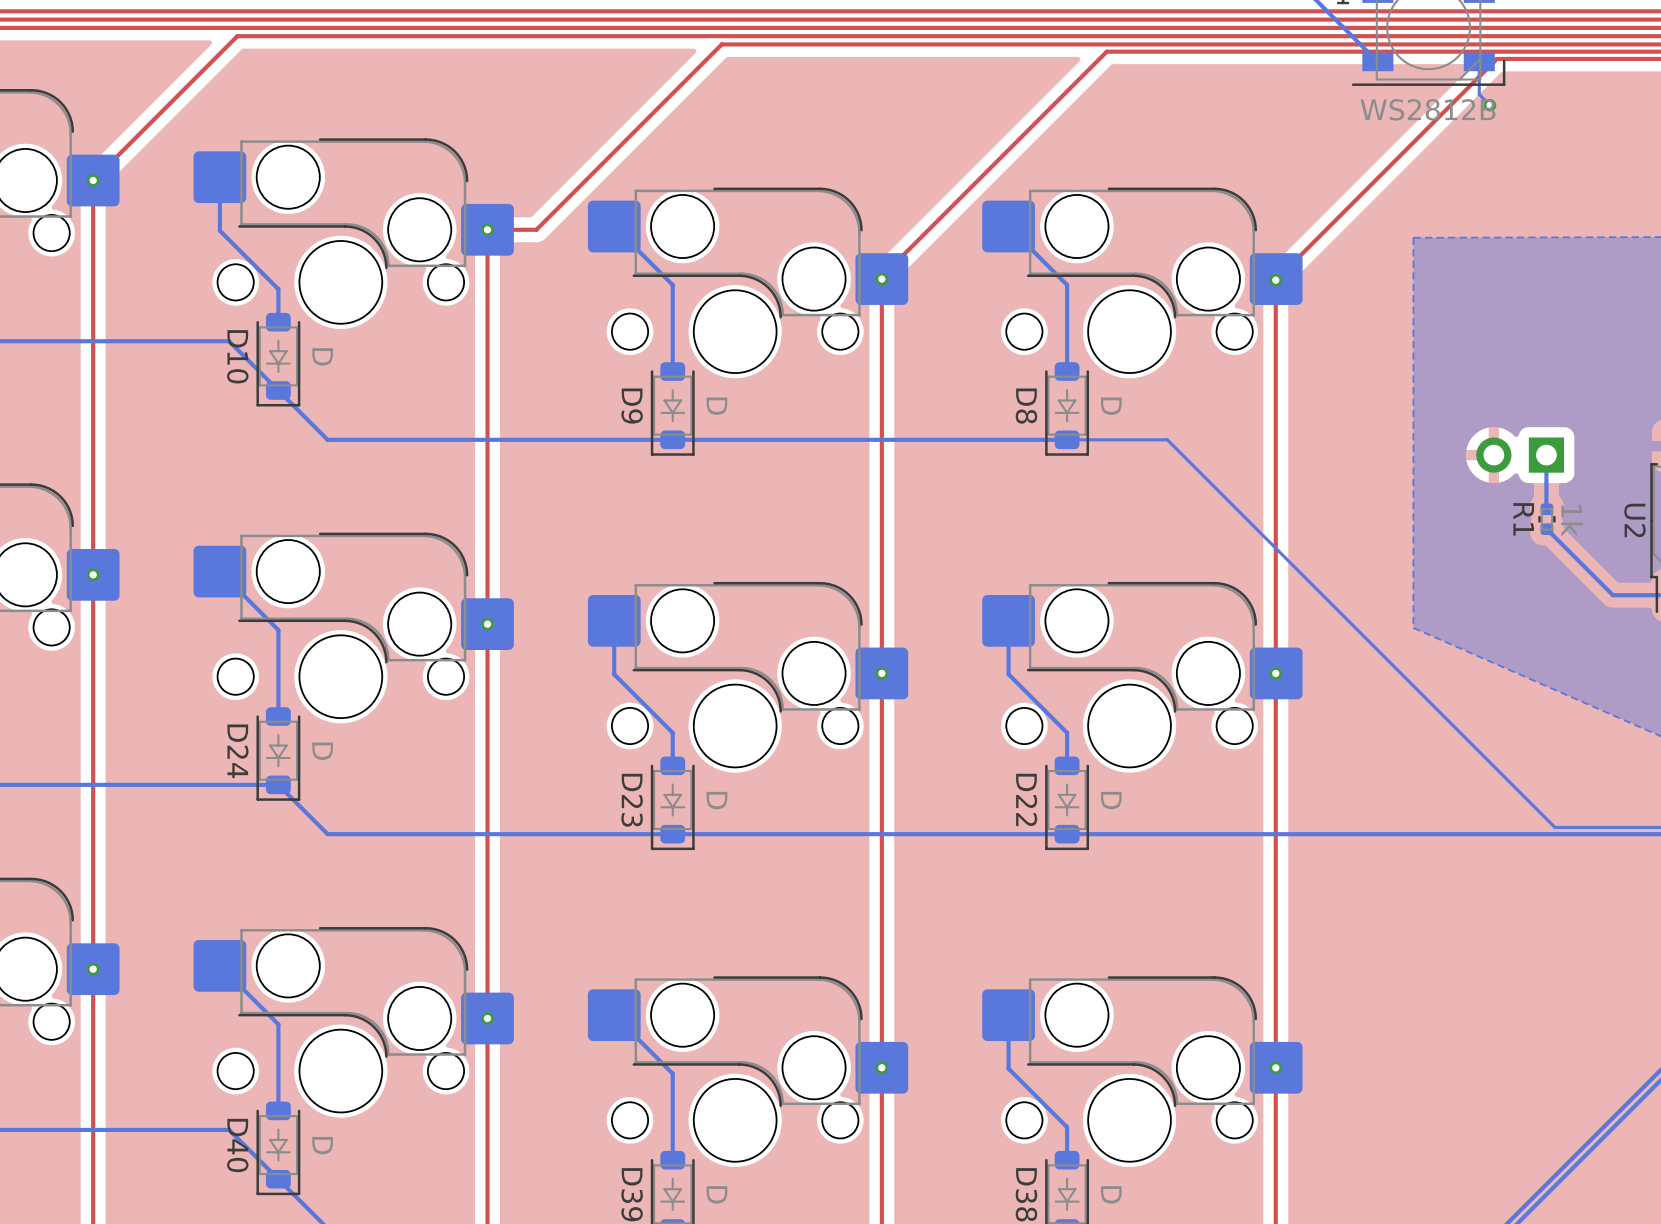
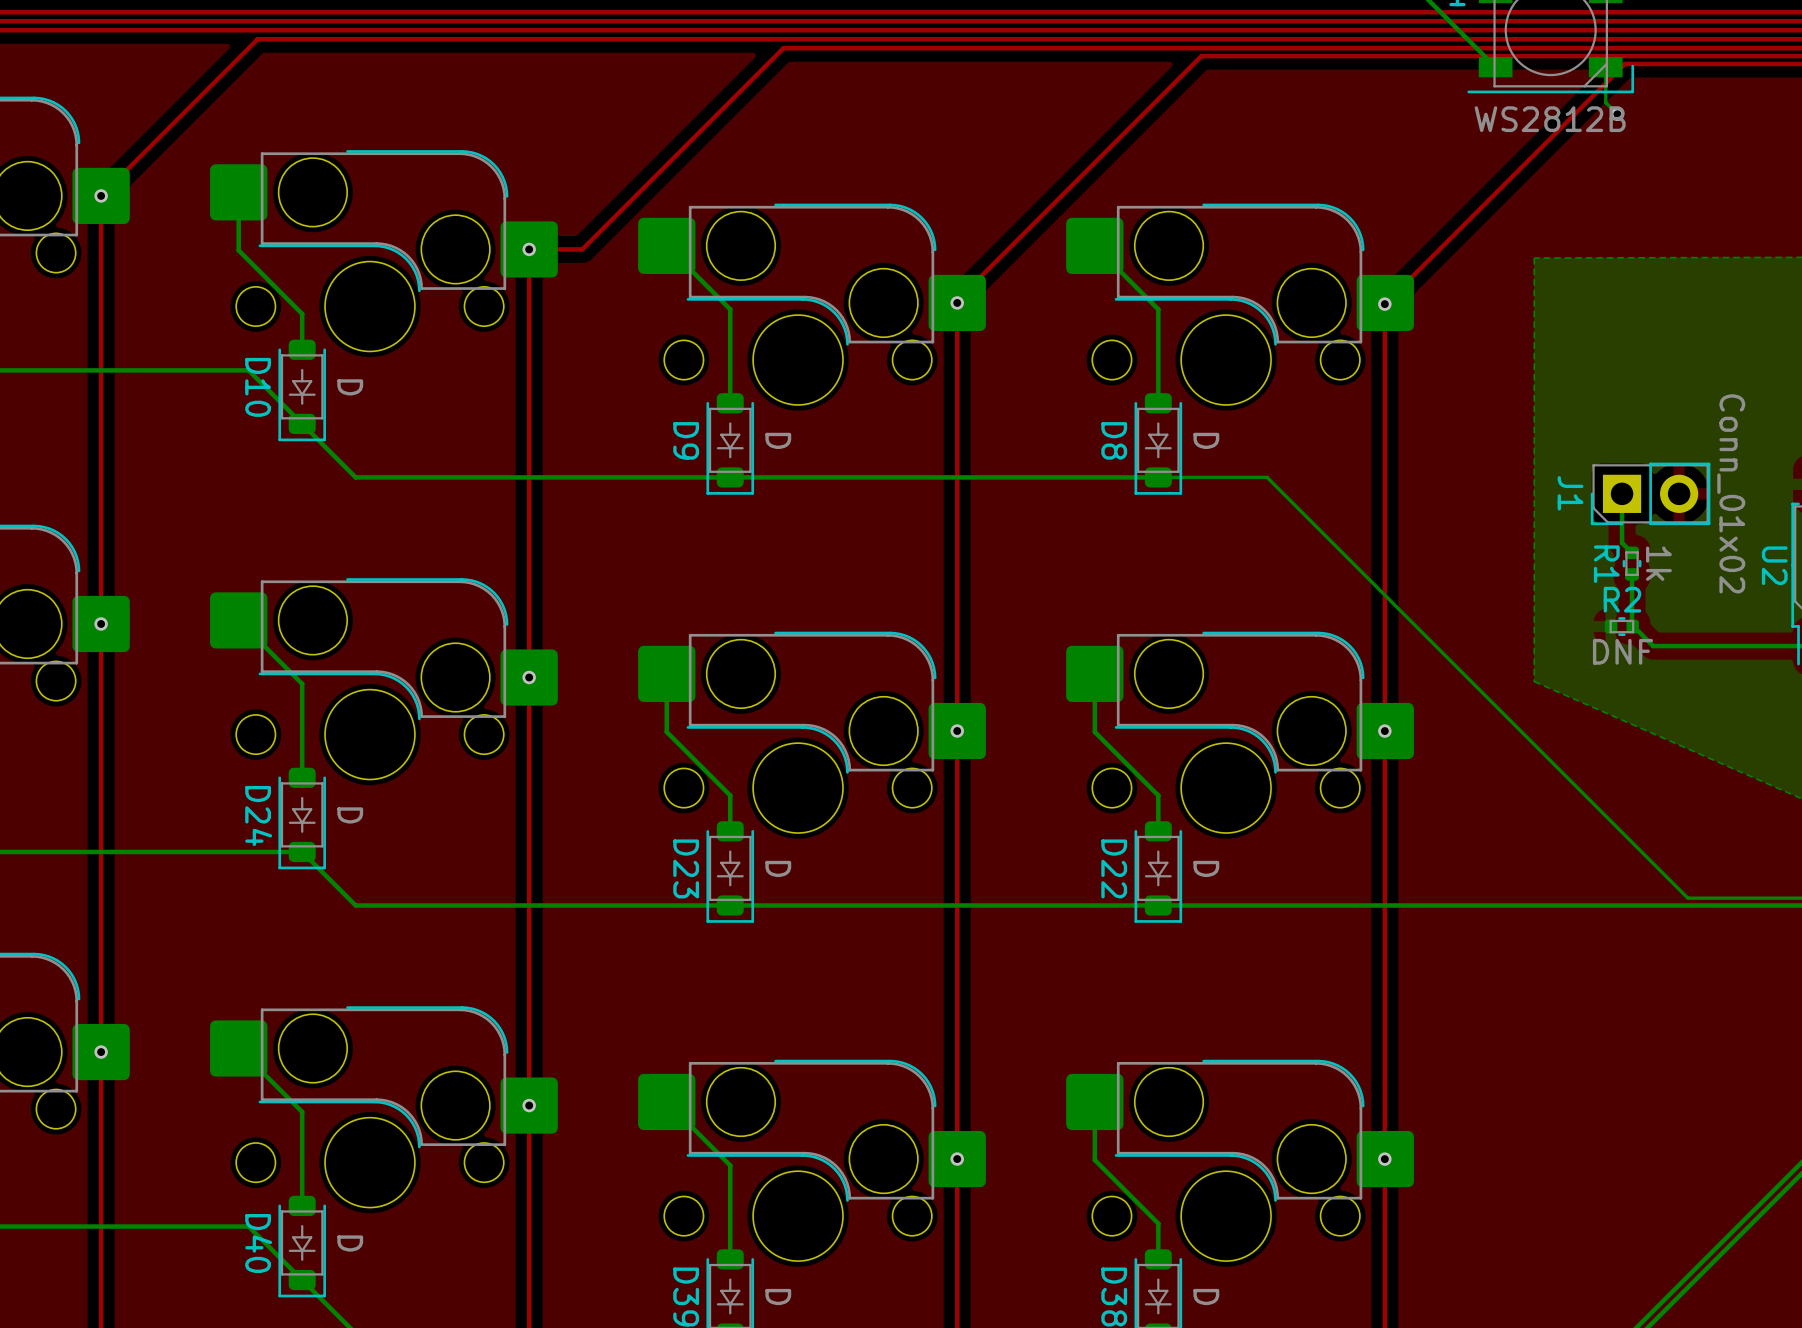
bottom track: none -> (1622, 493) (1622, 542) (1632, 552)
J1 side: top (1520, 455) -> bottom (1650, 493)
bottom track: (1546, 455) (1546, 509) -> none
R1 position: (1546, 519) -> (1632, 563)
bottom track: (1546, 529) (1612, 595) -> (1632, 574) (1632, 624) (1653, 646) (1750, 646)
R2: none -> DNF (1621, 626)

